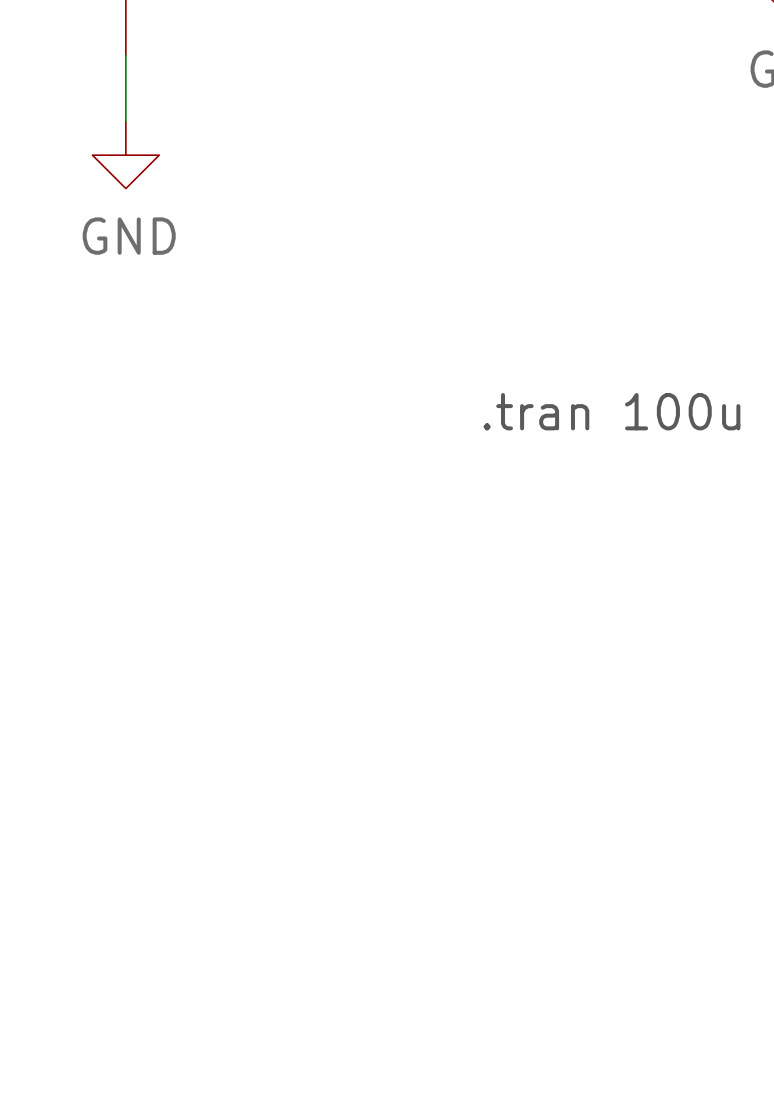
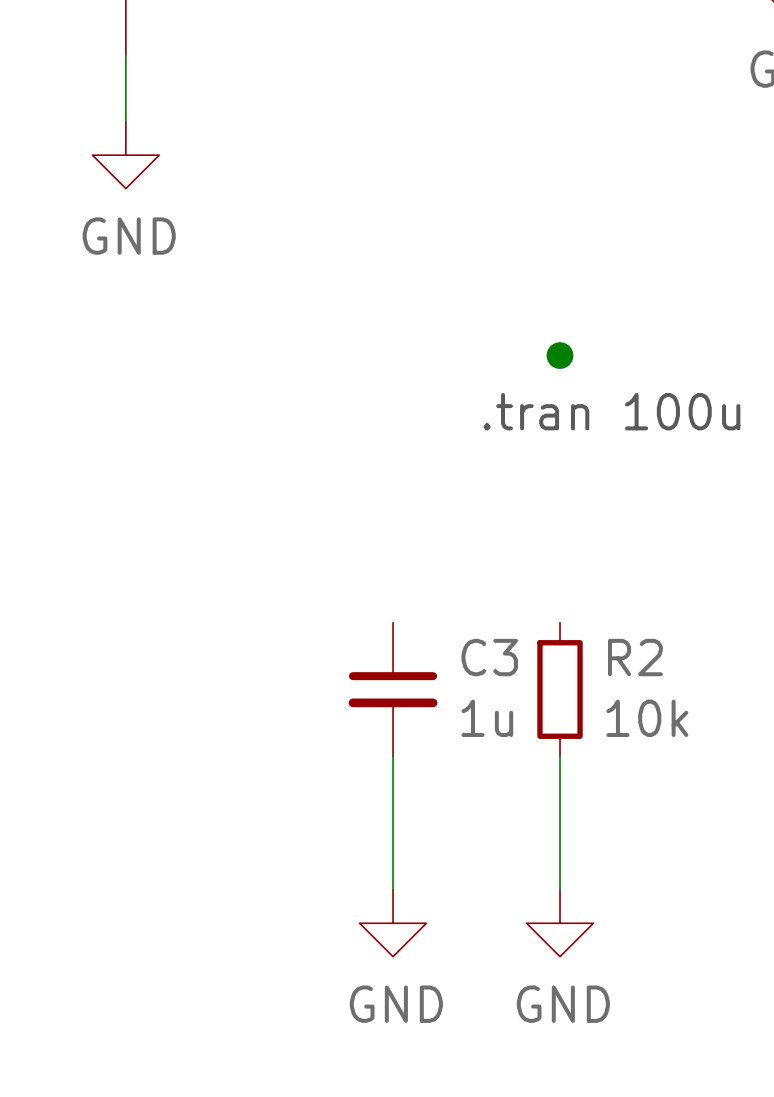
junction: none -> (560, 355)
C3: none -> 1u (393, 689)
R2: none -> 10k (560, 689)
wire: none -> (393, 756) (393, 889)
wire: none -> (560, 756) (560, 889)
power symbol: none -> GND (393, 923)
power symbol: none -> GND (560, 923)

